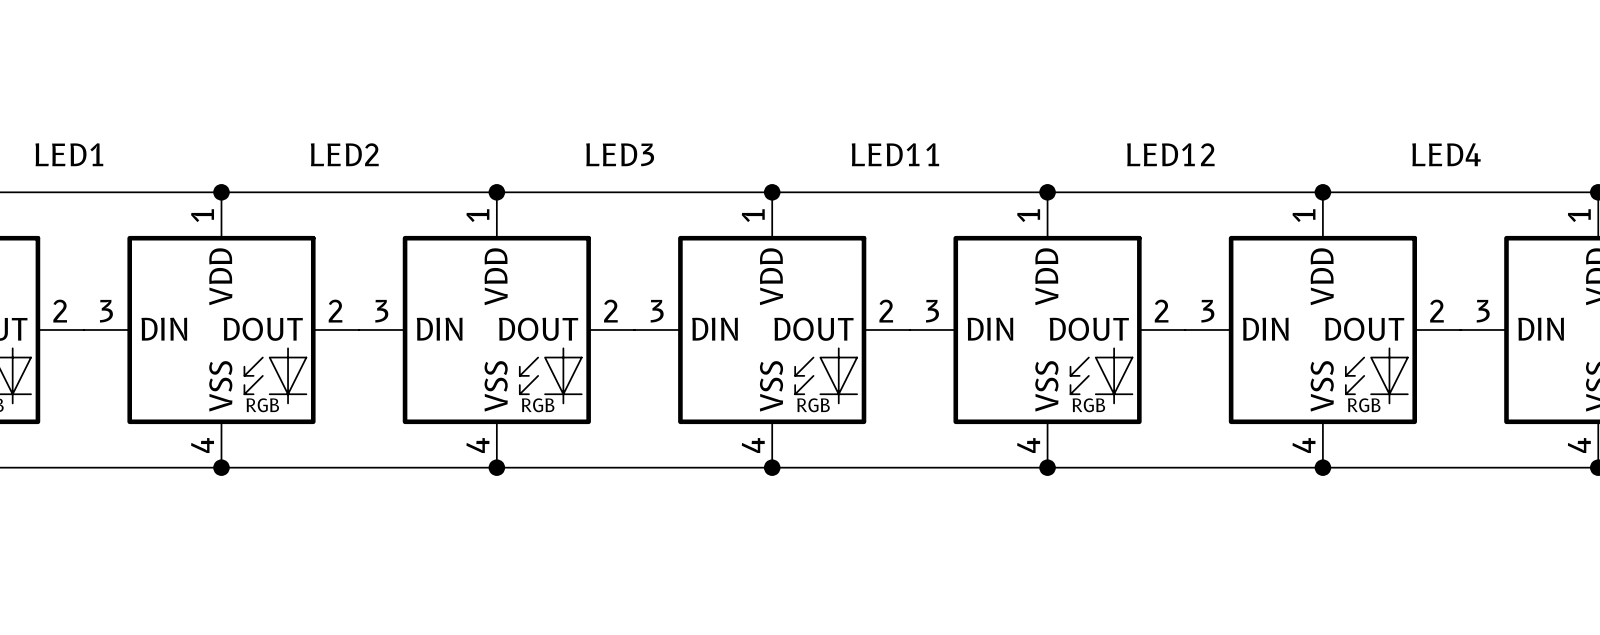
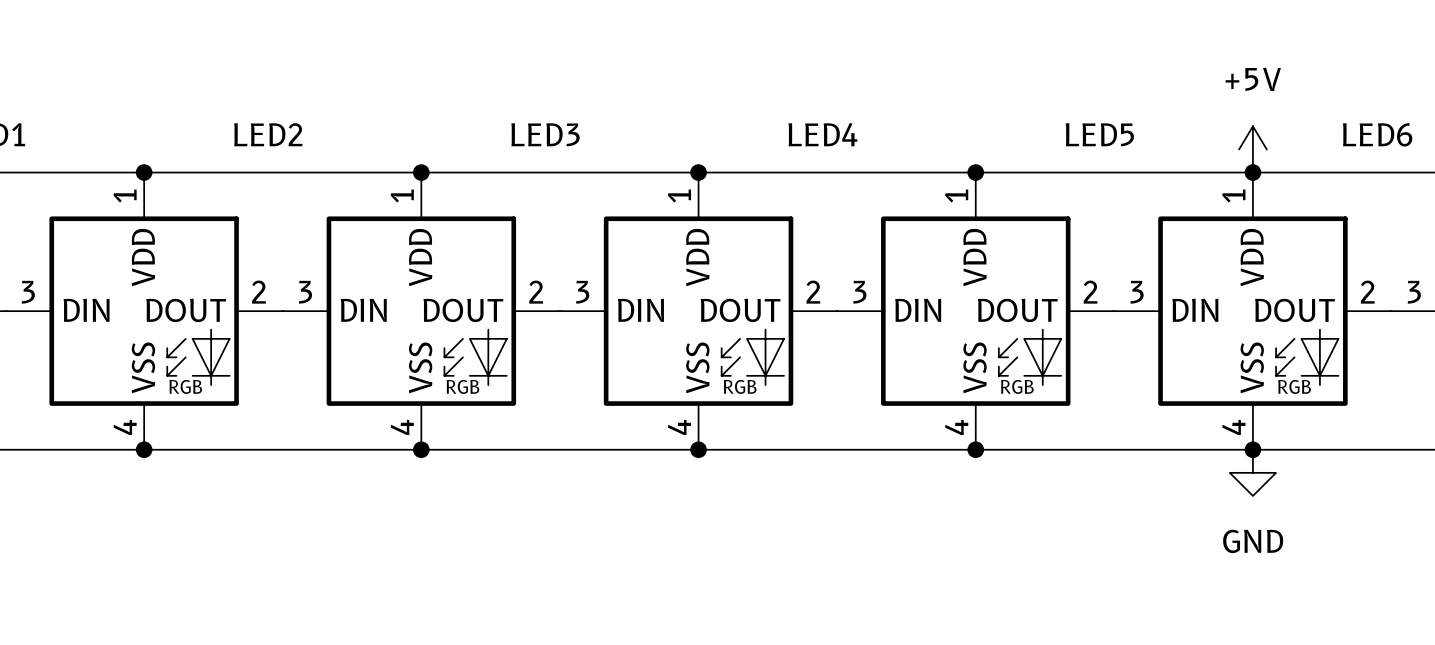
LED11 name: LED11 (895, 154) -> LED4 (822, 134)
LED12 name: LED12 (1170, 154) -> LED5 (1099, 134)
LED4 name: LED4 (1446, 154) -> LED6 (1377, 134)
power symbol: none -> +5V (1252, 149)
power symbol: none -> GND (1252, 472)

